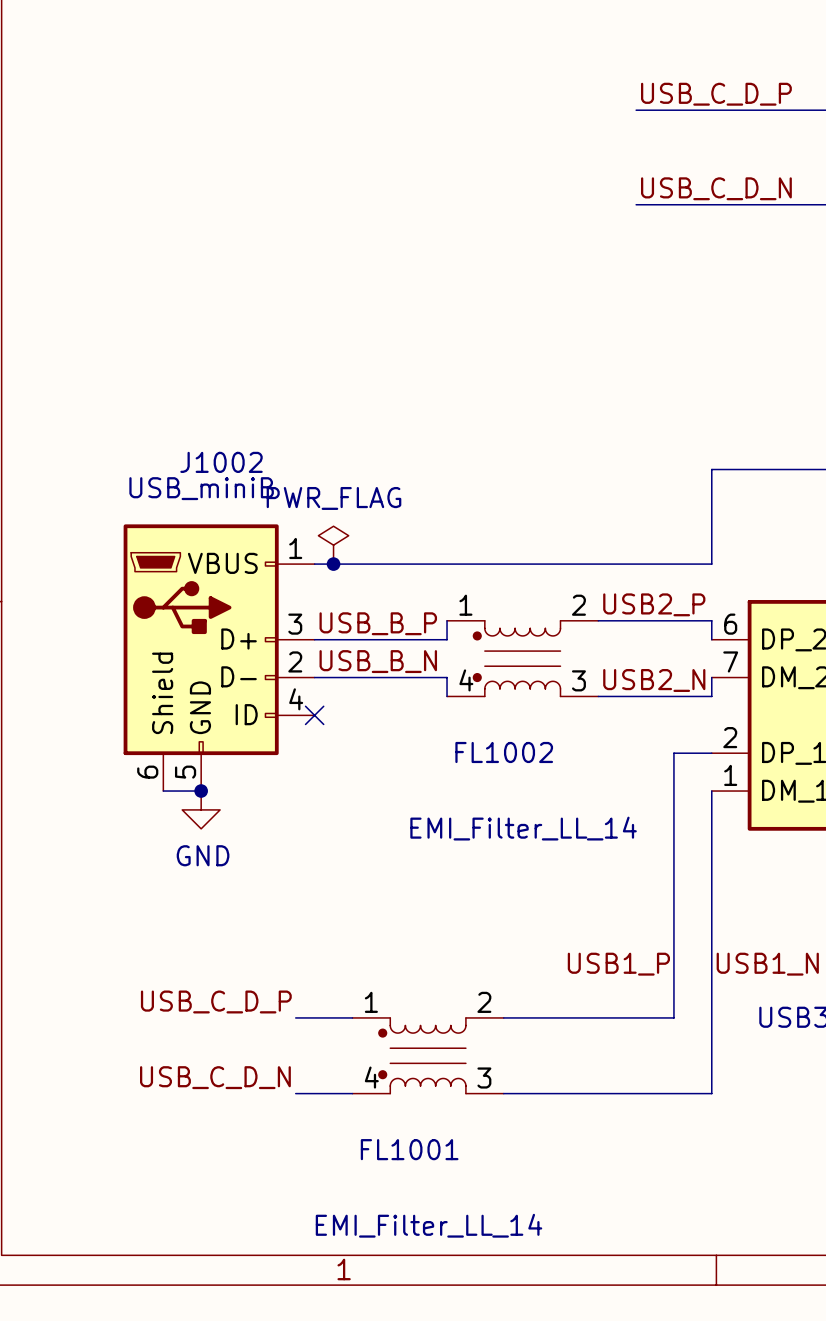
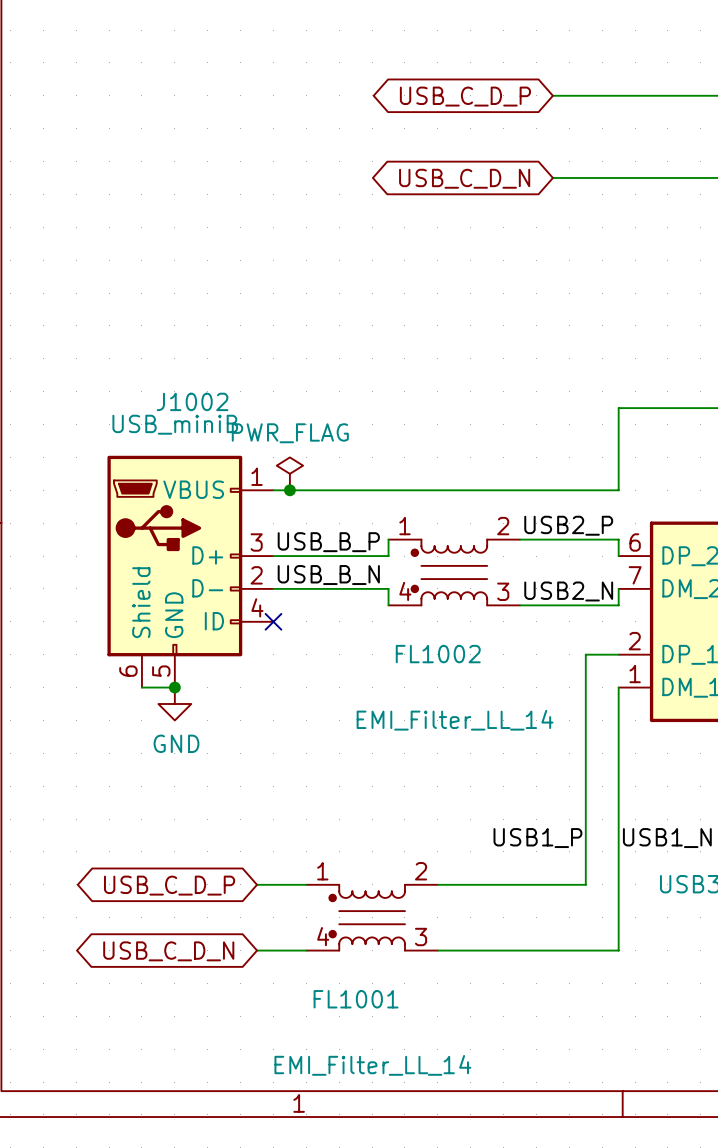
label: USB_C_D_P (716, 94) -> none
global label: none -> USB_C_D_P (465, 96)
label: USB_C_D_N (716, 188) -> none
global label: none -> USB_C_D_N (464, 178)
label: USB_C_D_P (216, 1001) -> none
global label: none -> USB_C_D_P (169, 885)
label: USB_C_D_N (215, 1077) -> none
global label: none -> USB_C_D_N (168, 951)

